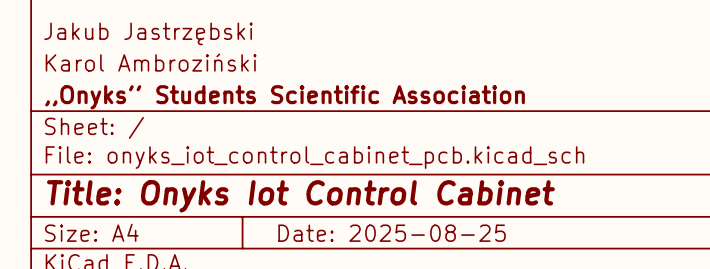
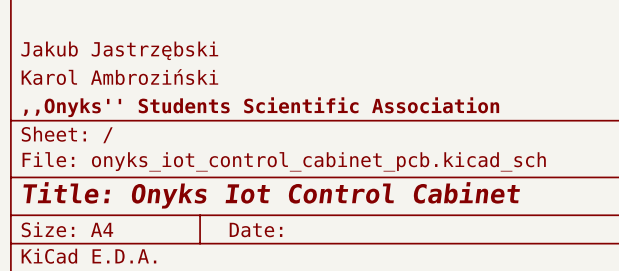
title block: Date: 2025-08-25 (392, 233) -> Date: (256, 230)

